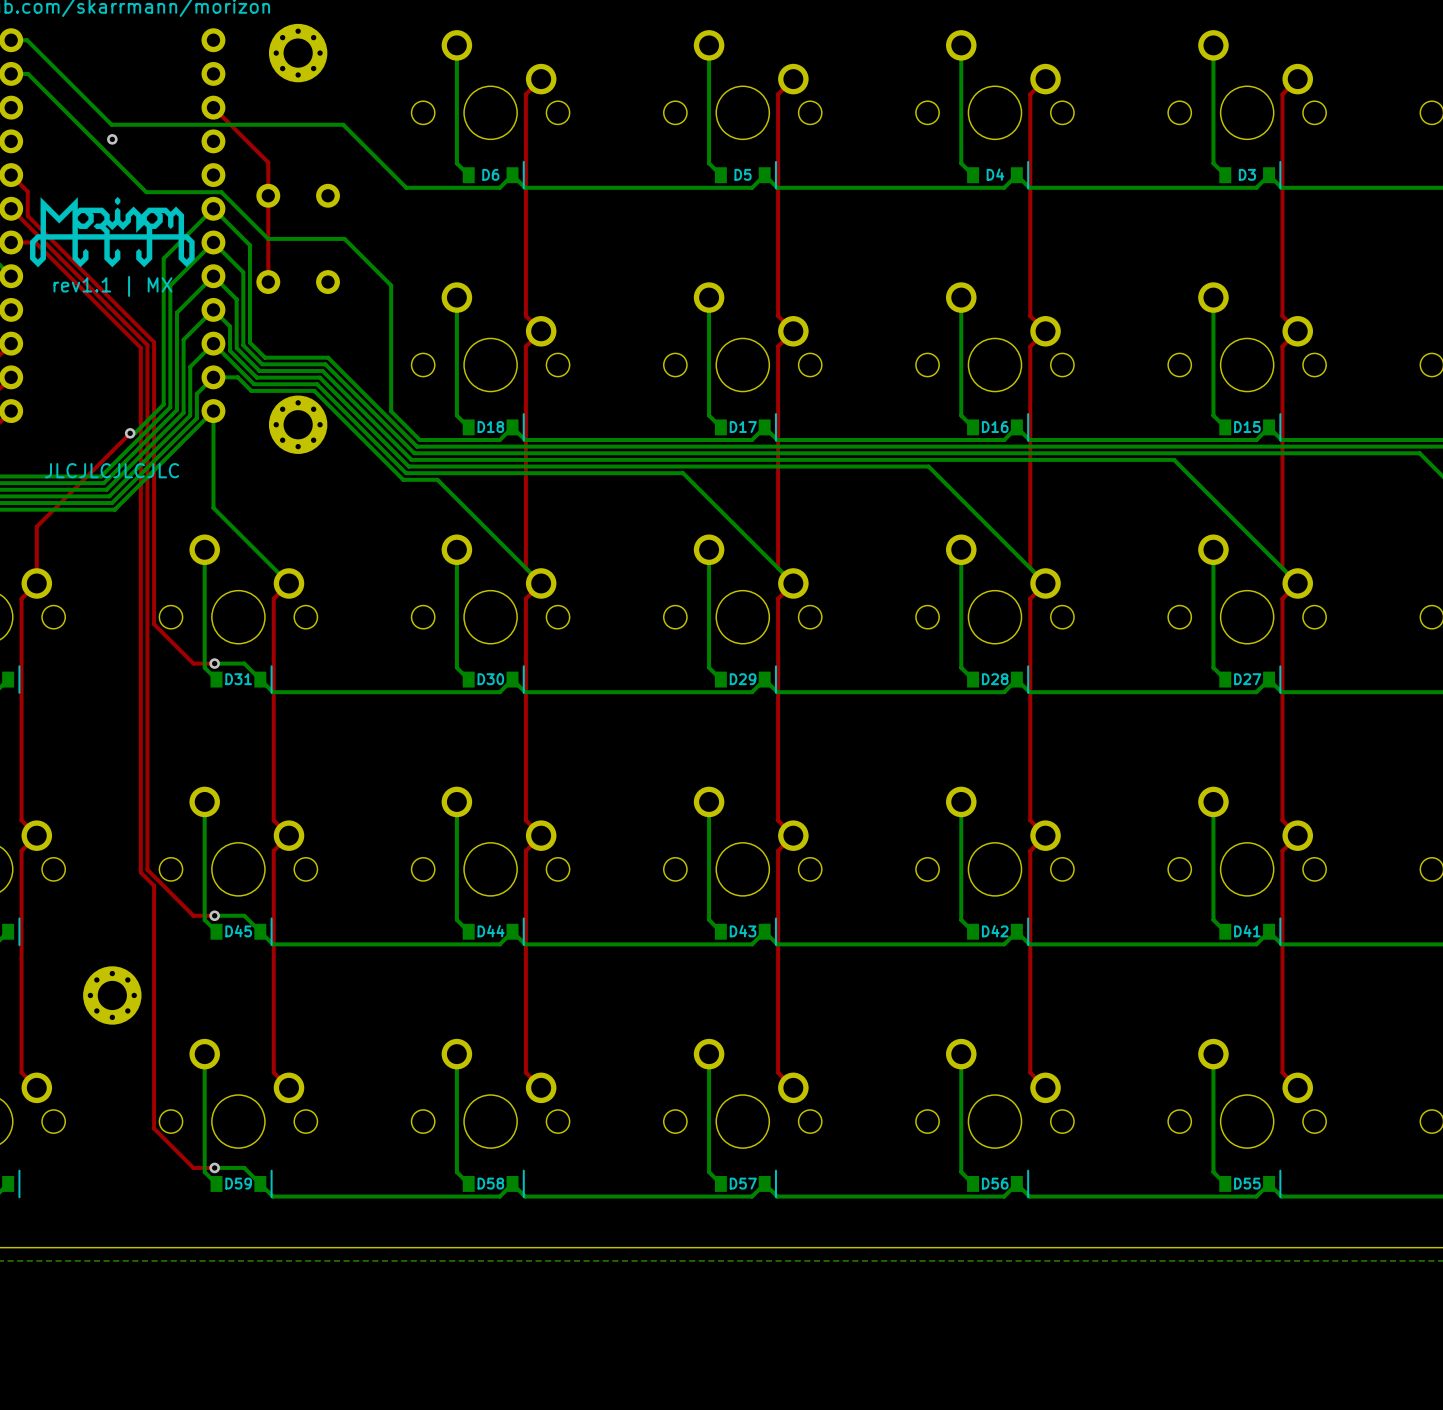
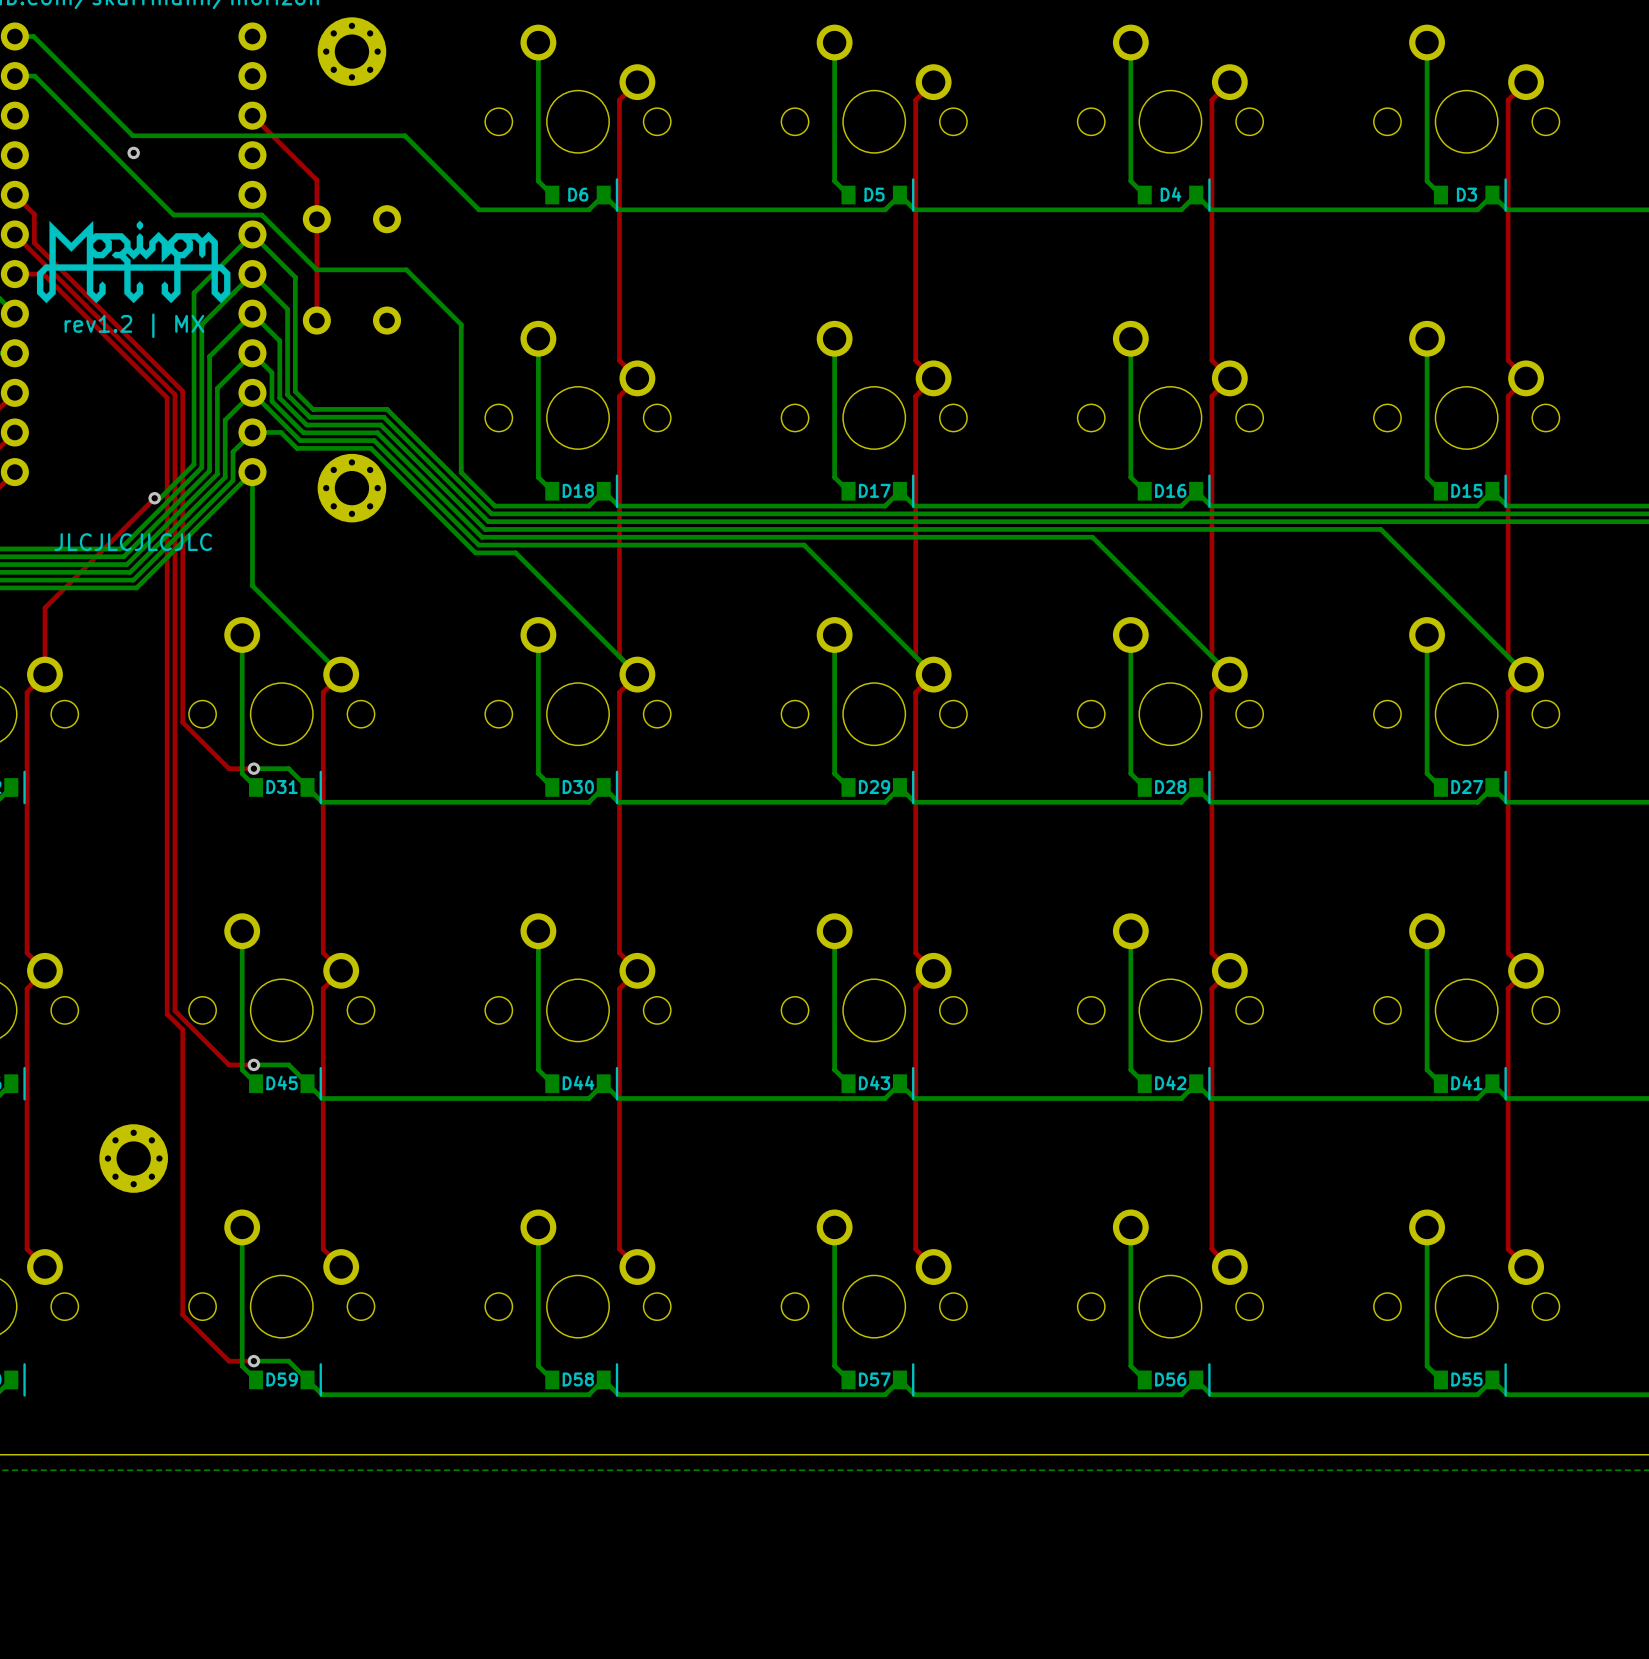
text: rev1.1 | MX (112, 286) -> rev1.2 | MX (134, 325)

